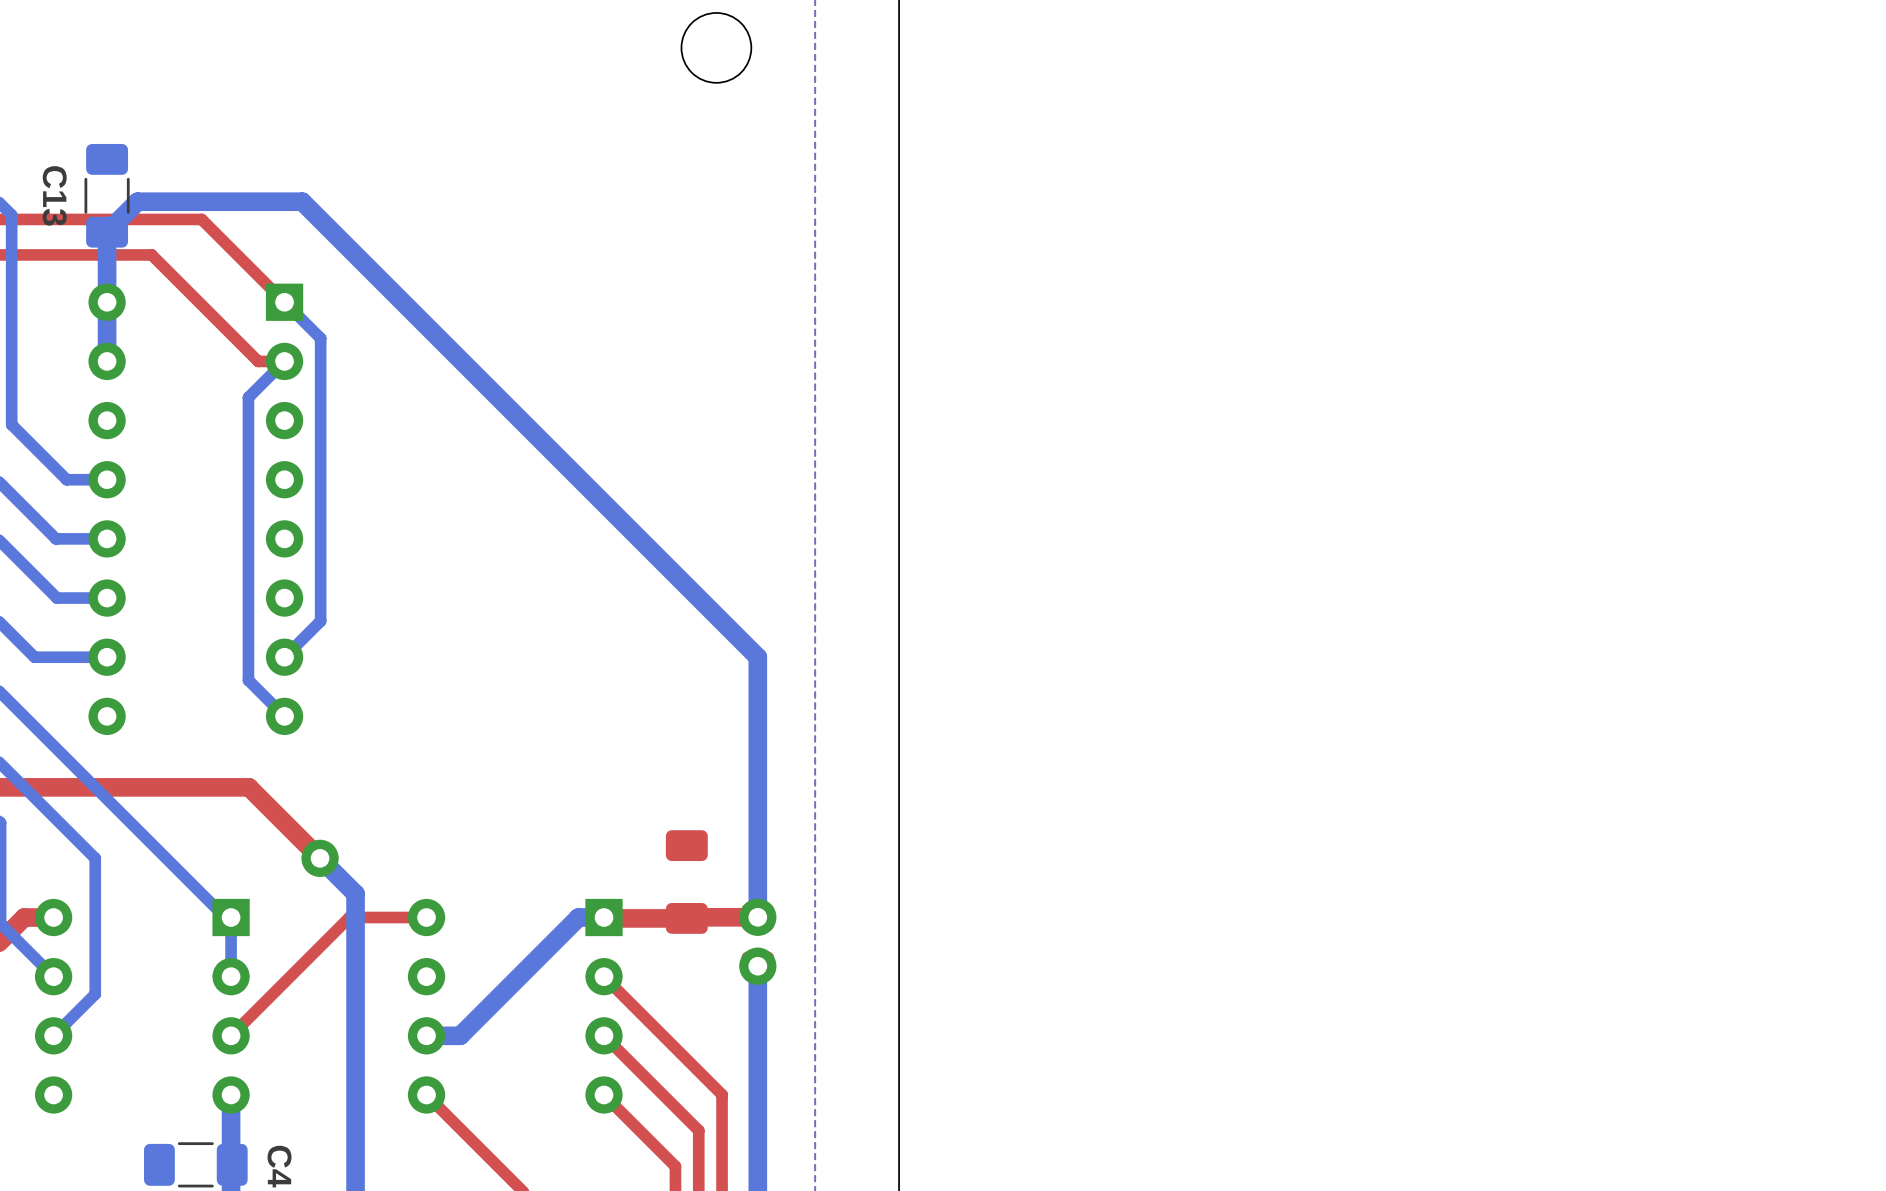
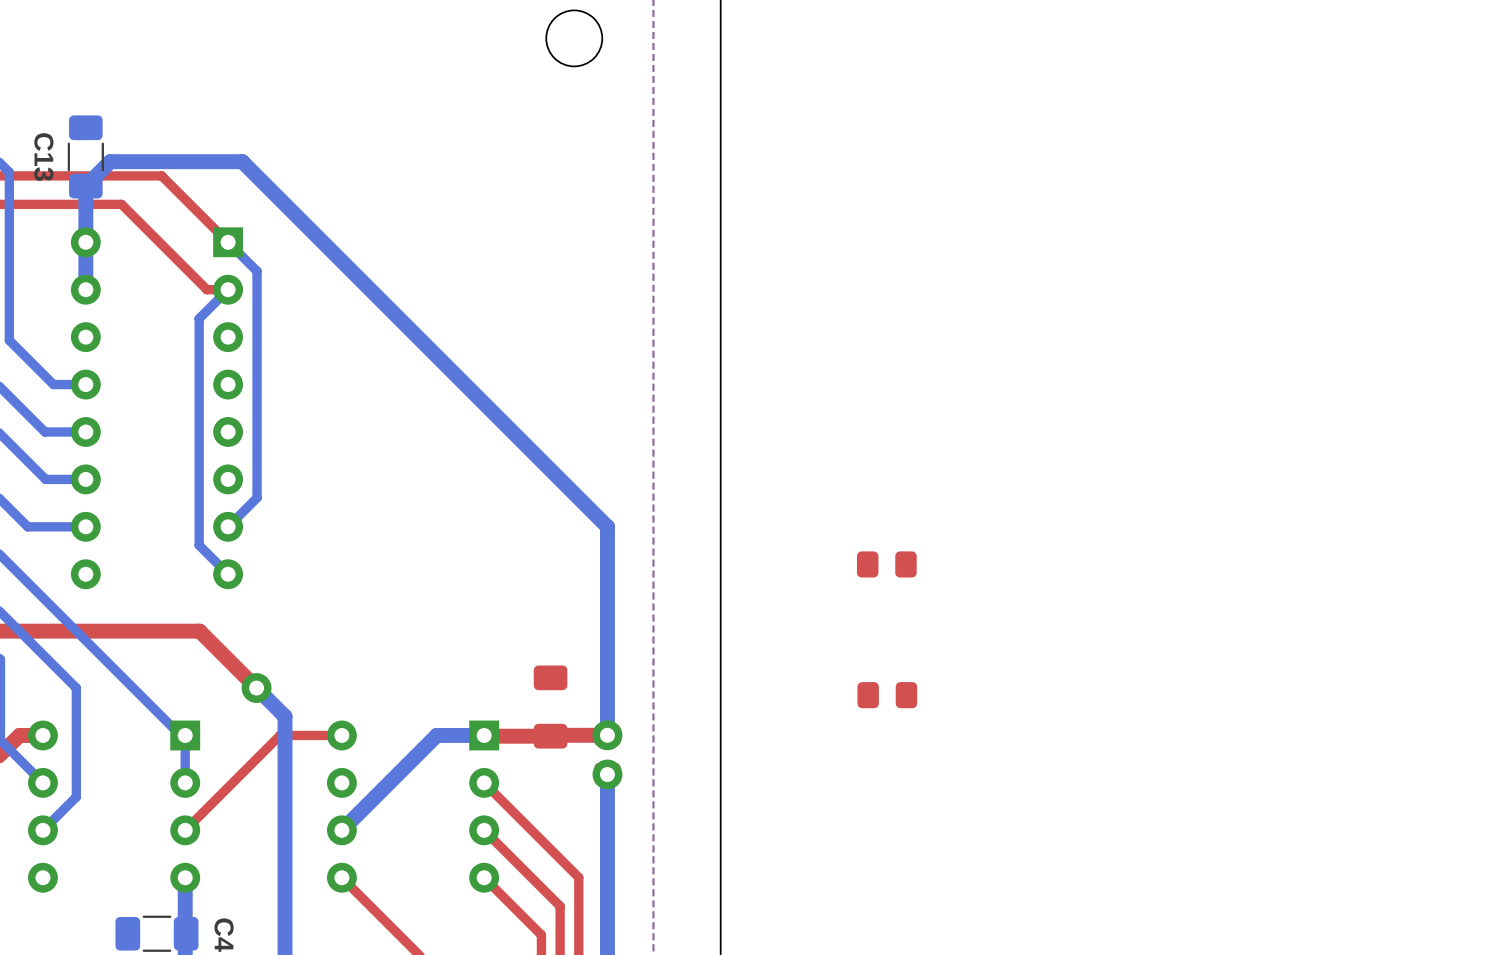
part: none -> (886, 564)
part: none -> (887, 695)
bottom track: (578, 917) (460, 1035) (426, 1035) -> (463, 735) (436, 735) (341, 830)

